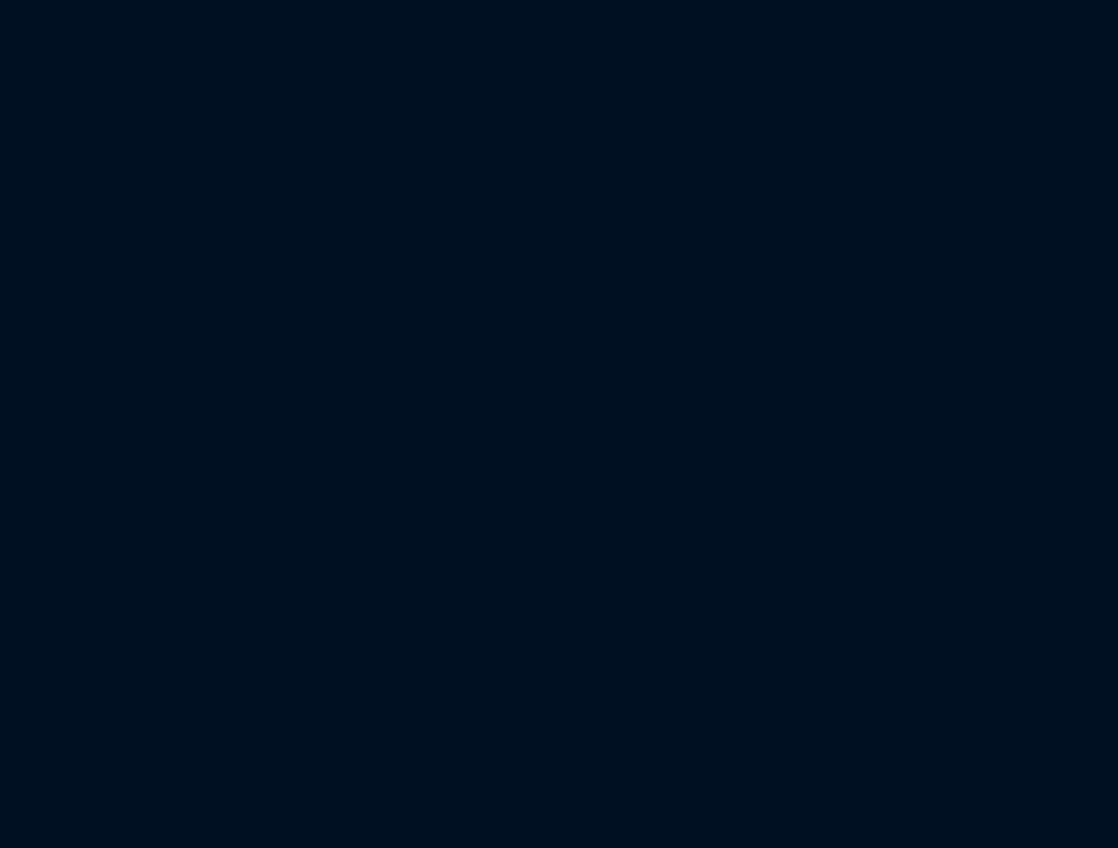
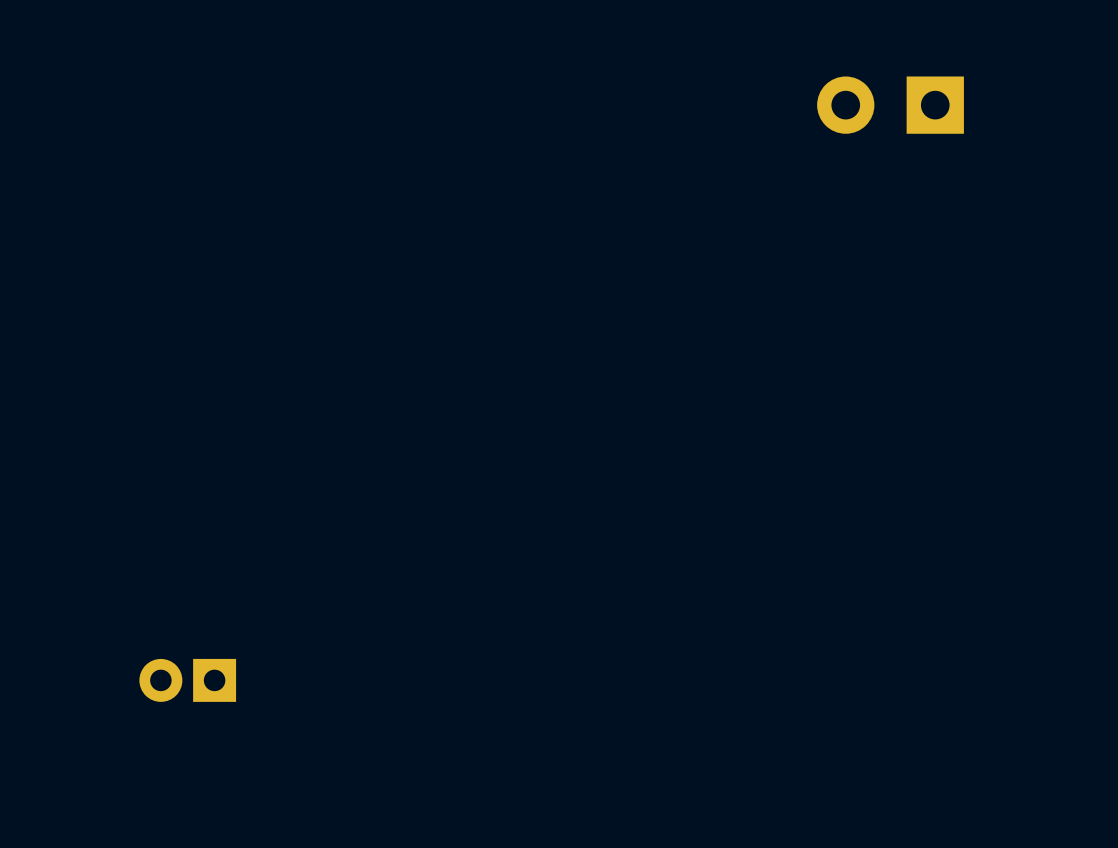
part: none -> (890, 105)
part: none -> (187, 680)

